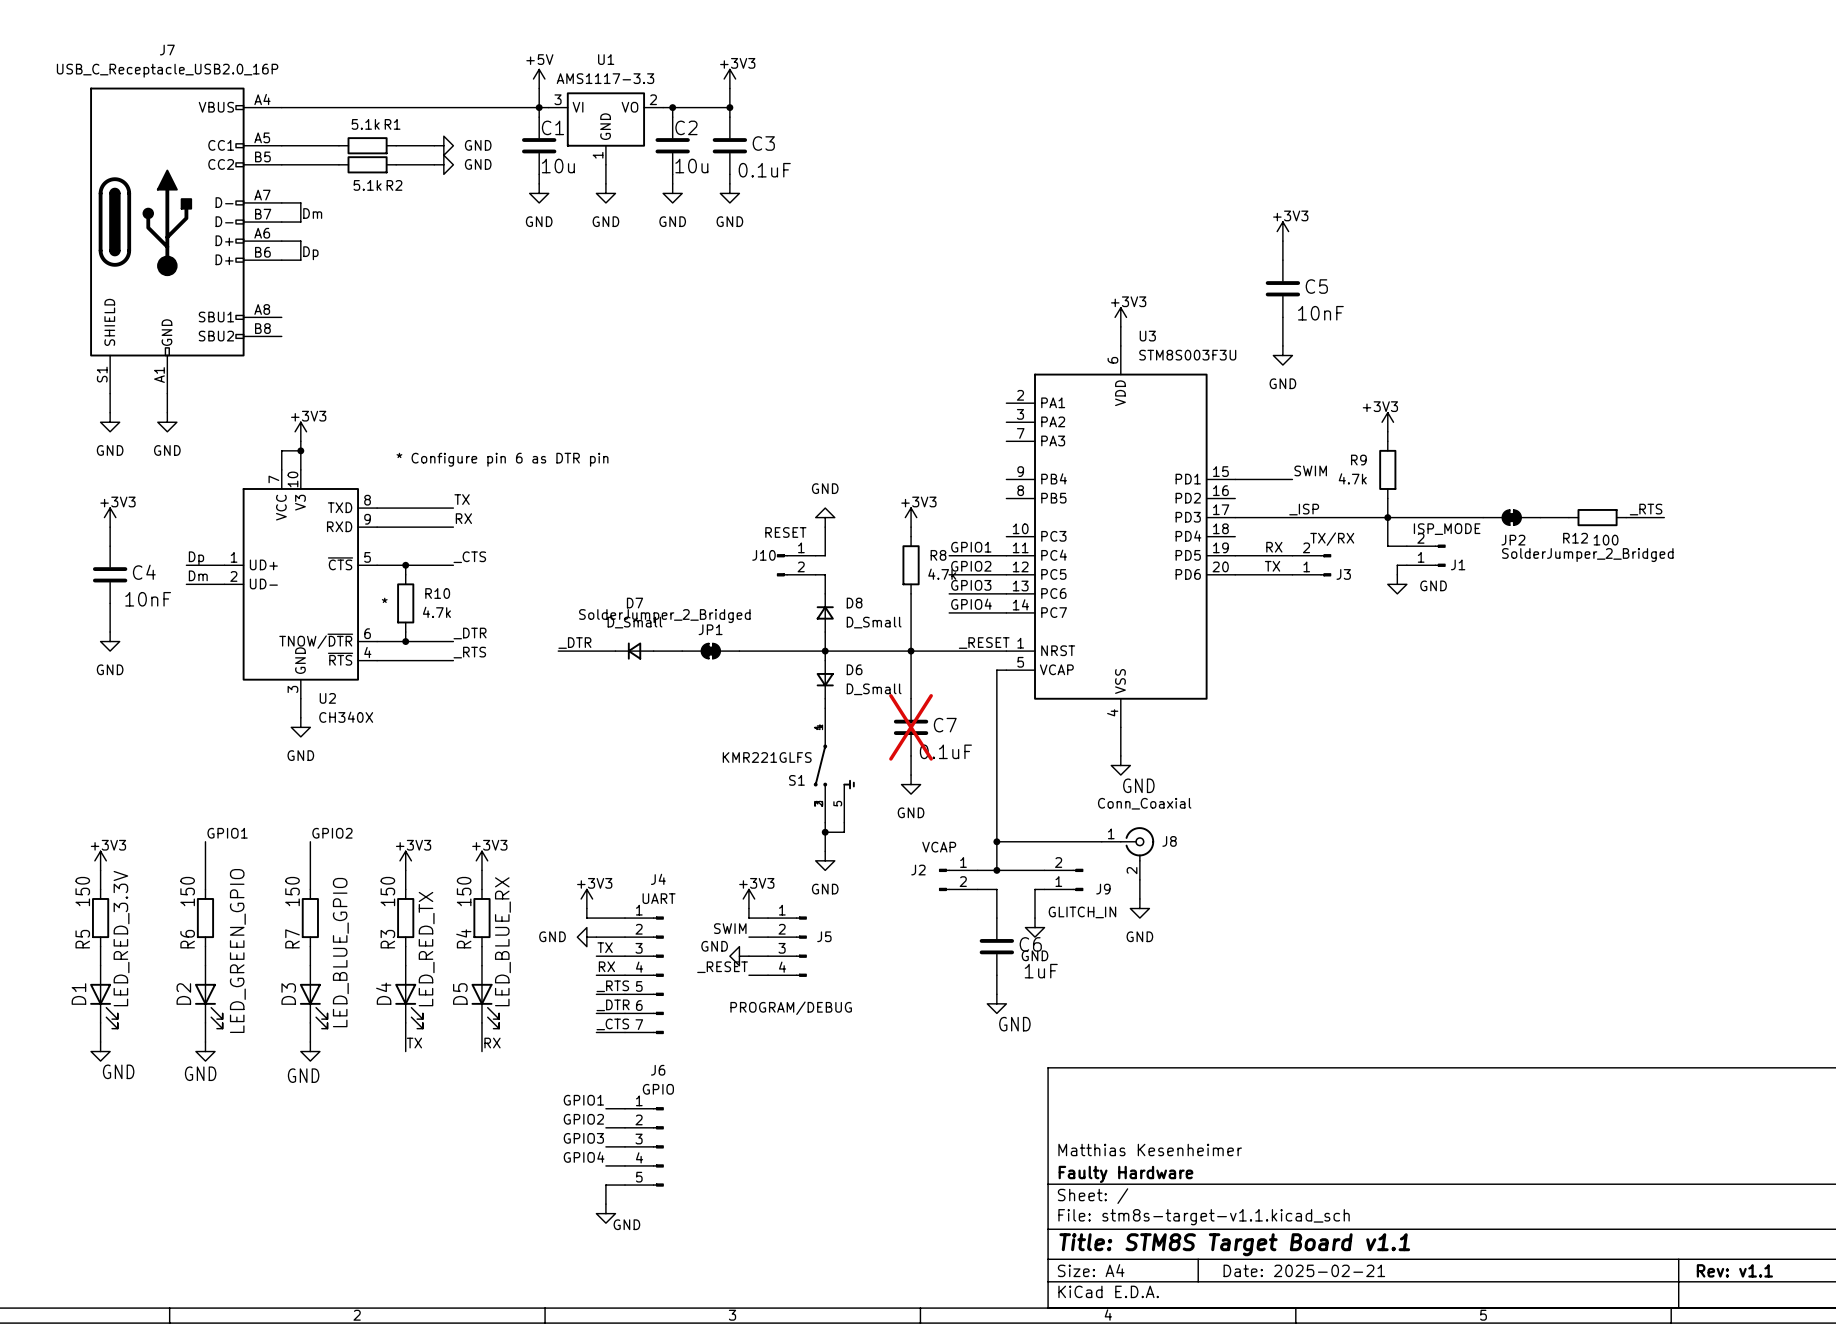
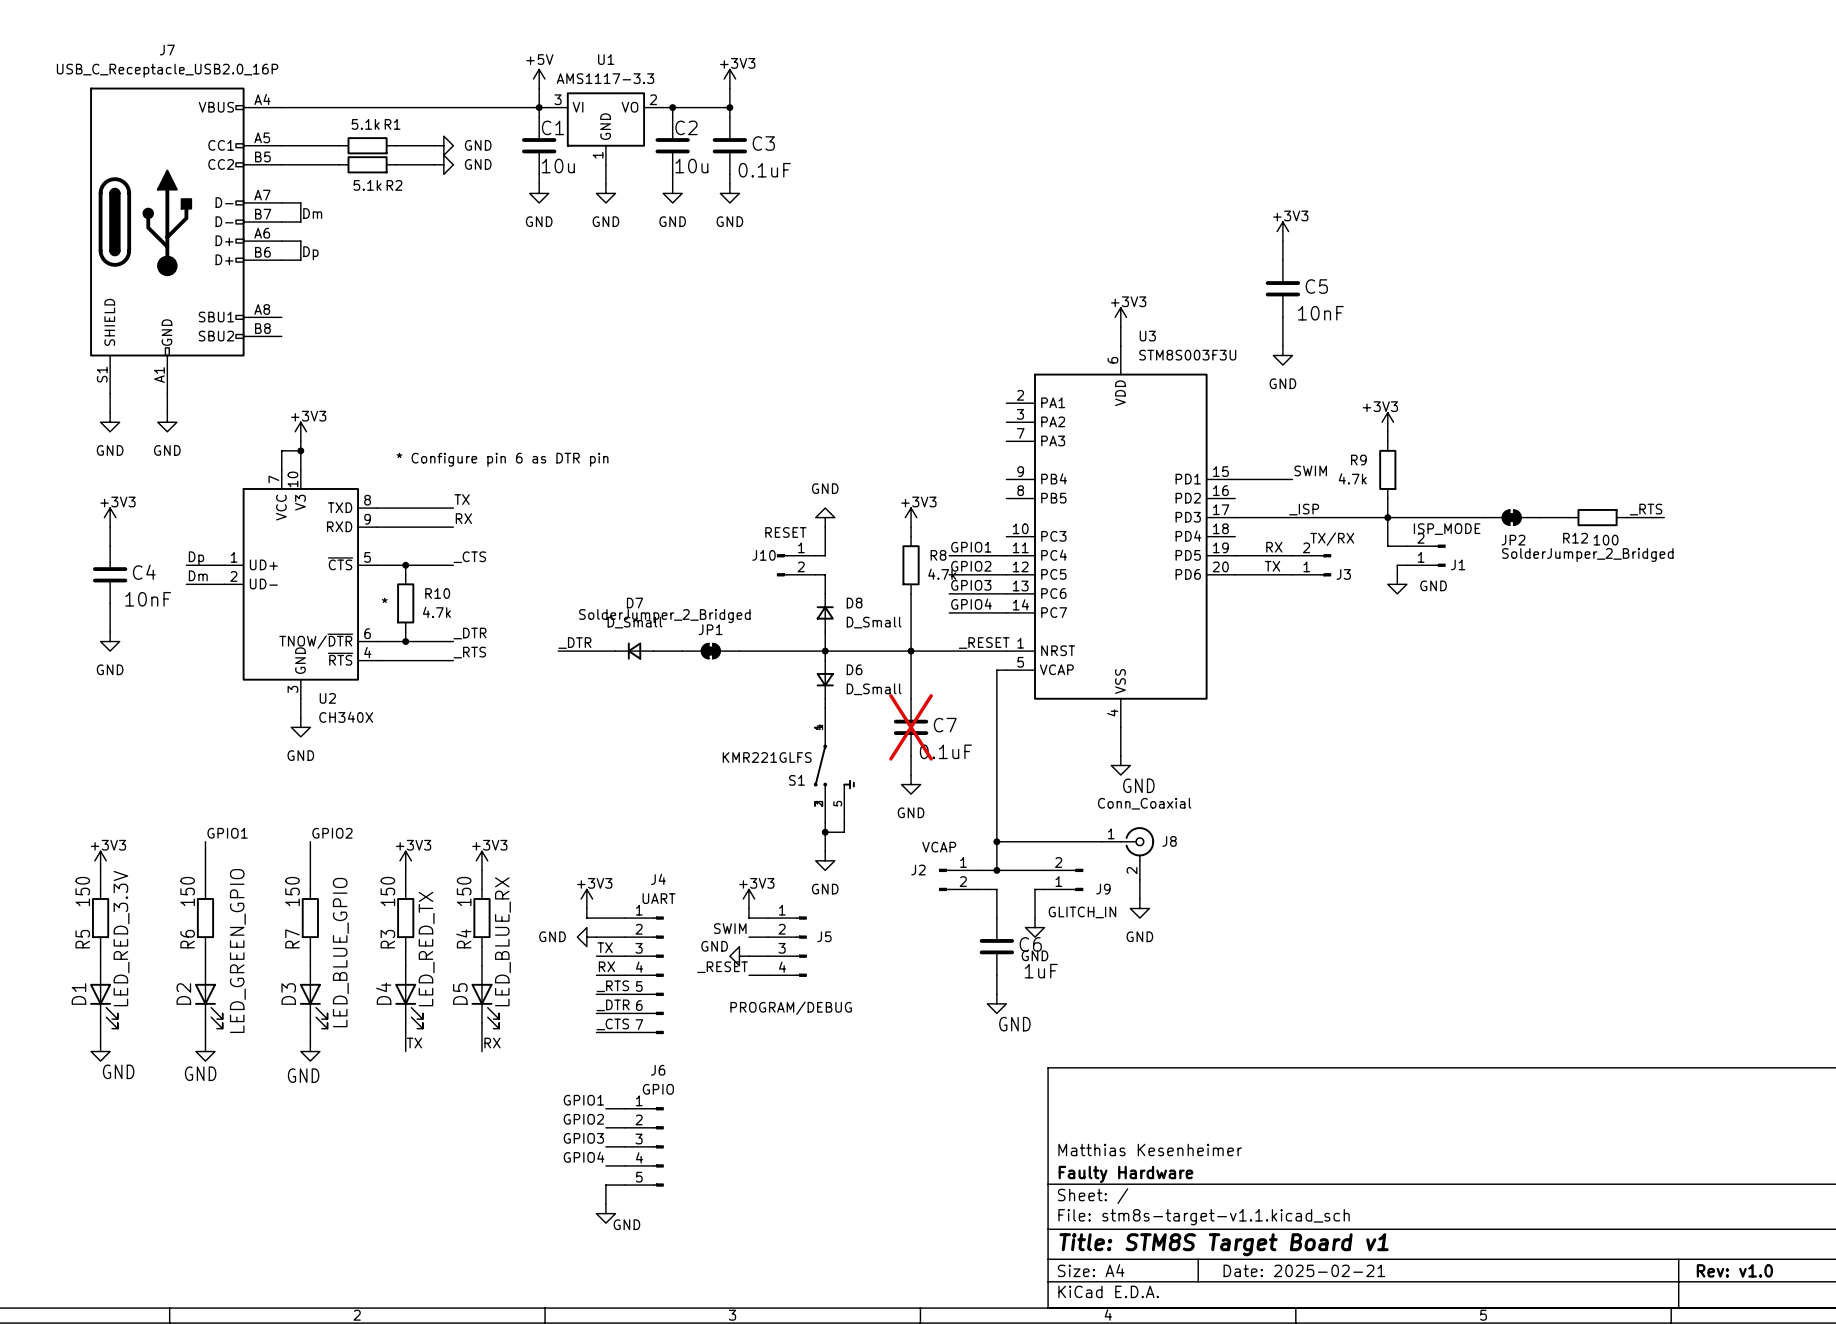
title block: Title: STM8S Target Board v1.1 (1234, 1244) -> Title: STM8S Target Board v1 (1224, 1244)
title block: Rev: v1.1 (1734, 1270) -> Rev: v1.0 (1734, 1270)

